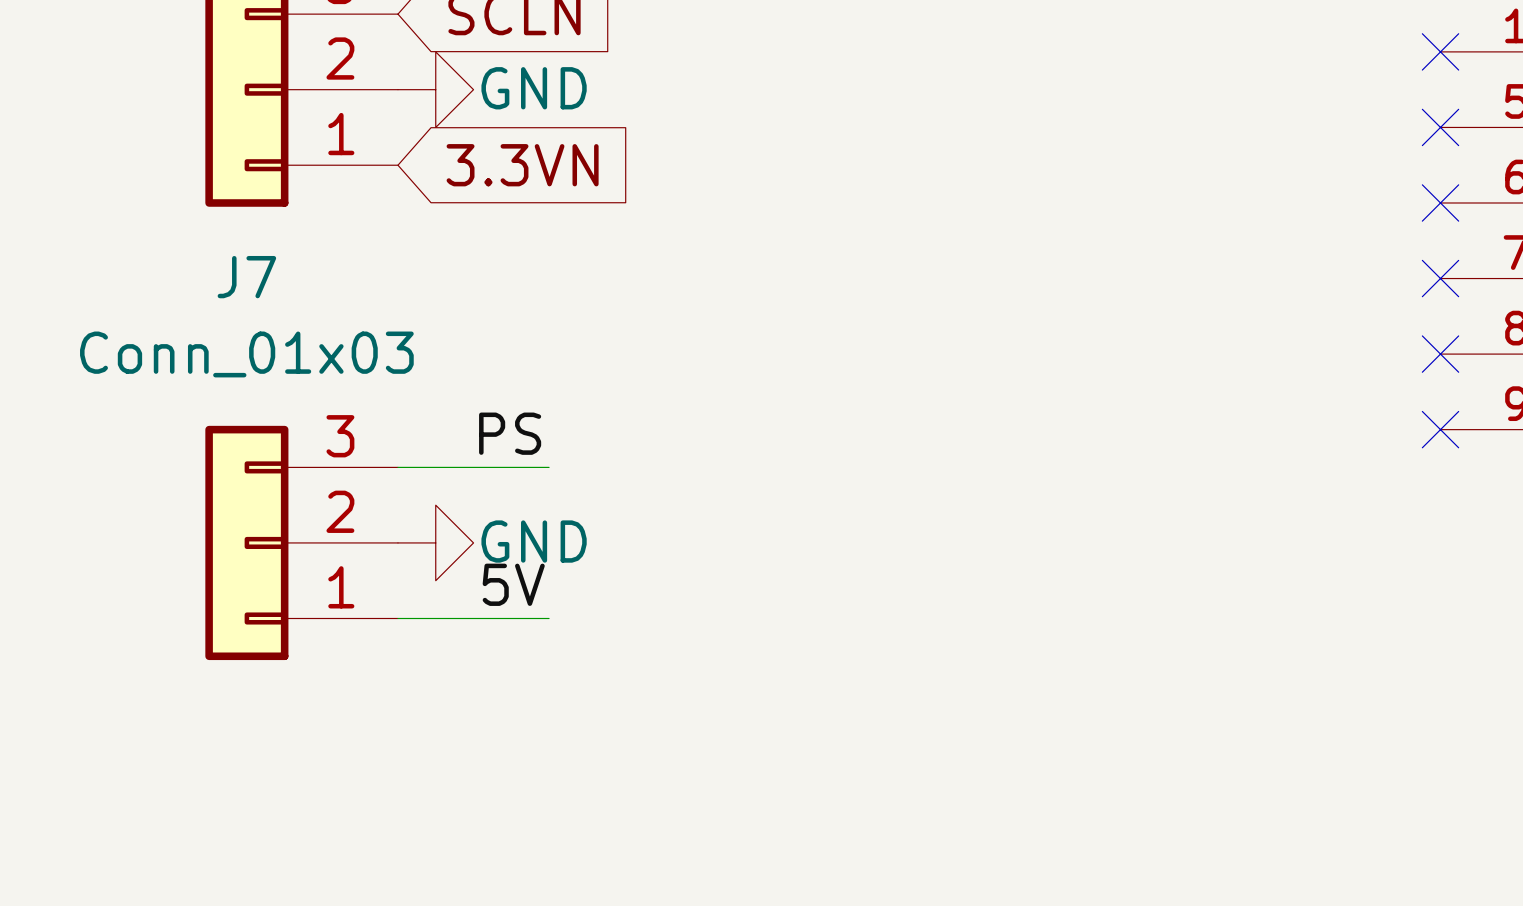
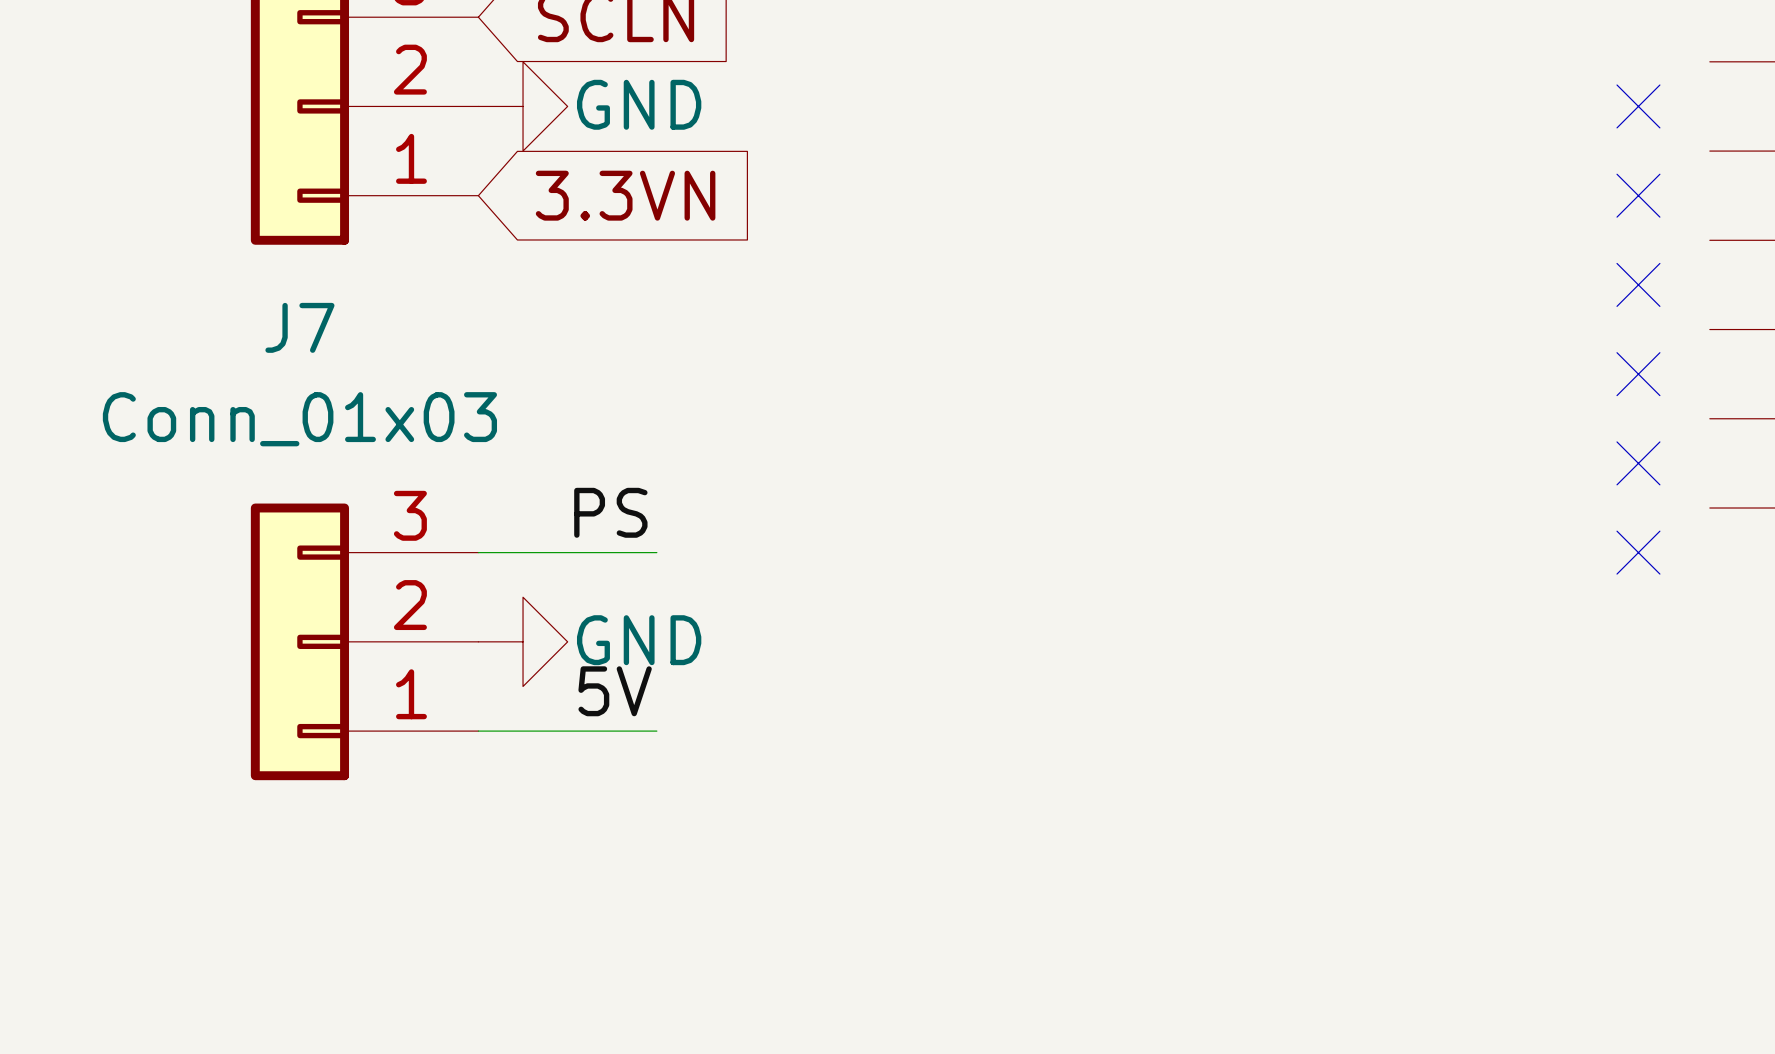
no-connect mark: (1440, 51) -> none
no-connect mark: none -> (1638, 106)
no-connect mark: (1440, 127) -> none
no-connect mark: none -> (1638, 195)
no-connect mark: (1440, 202) -> none
no-connect mark: none -> (1638, 284)
no-connect mark: (1440, 278) -> none
no-connect mark: none -> (1638, 374)
no-connect mark: (1440, 354) -> none
no-connect mark: none -> (1638, 463)
no-connect mark: (1440, 429) -> none
no-connect mark: none -> (1638, 552)

